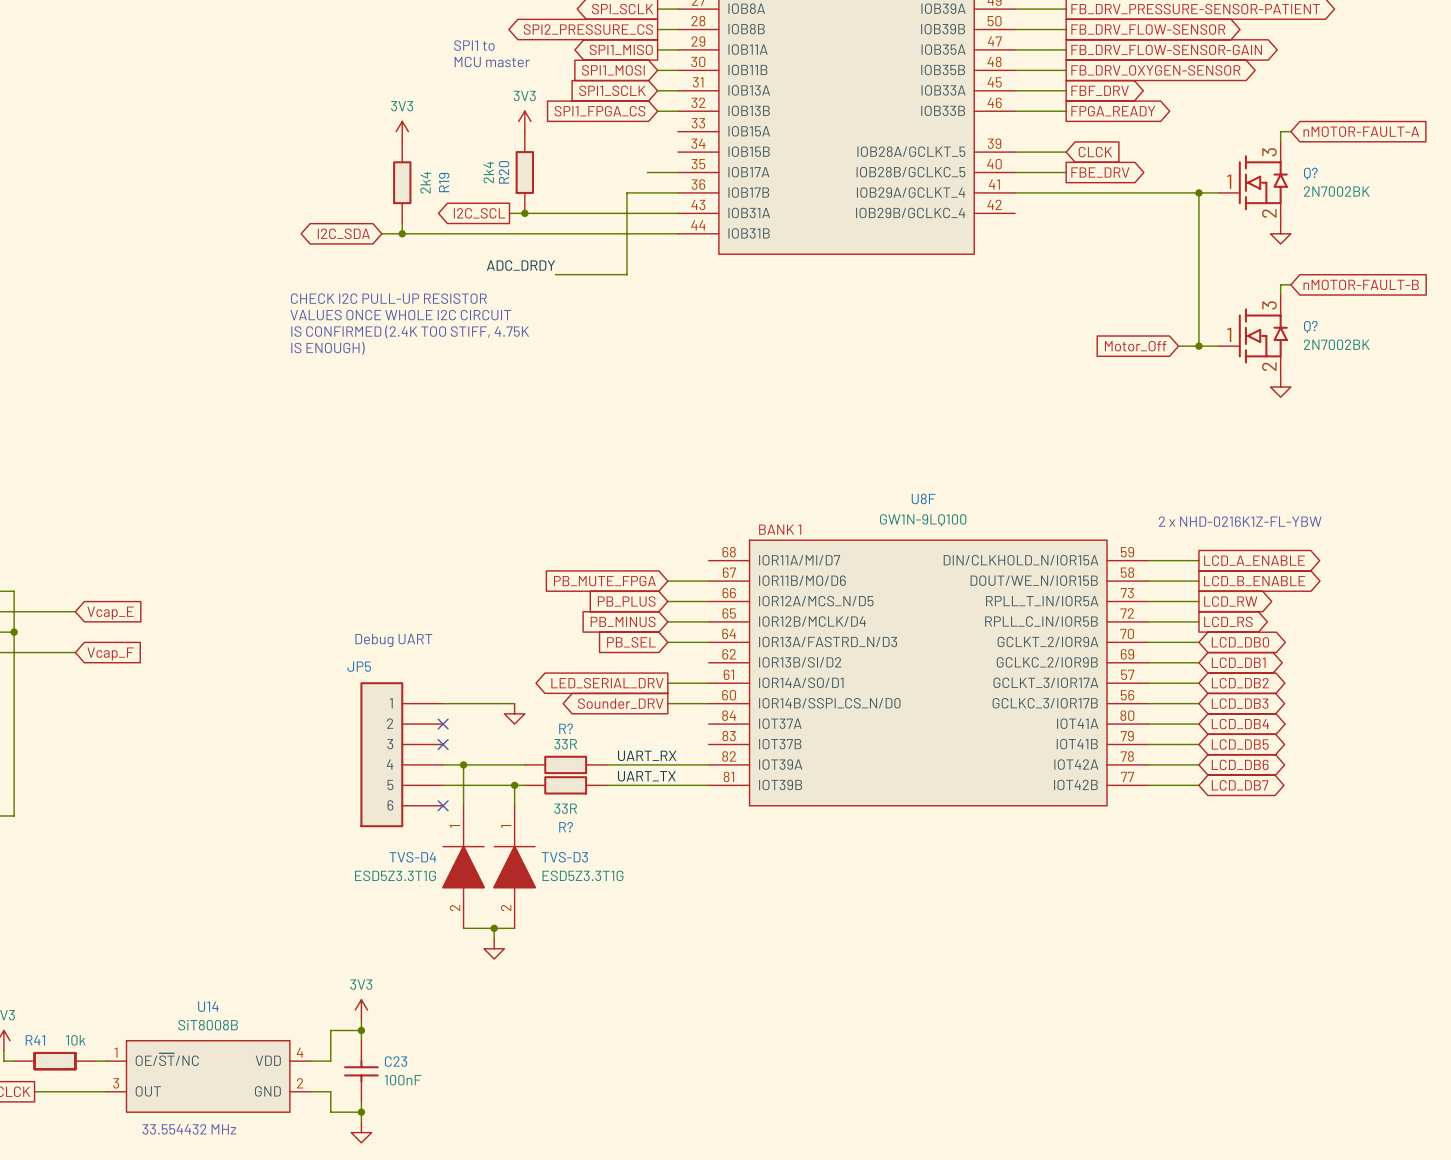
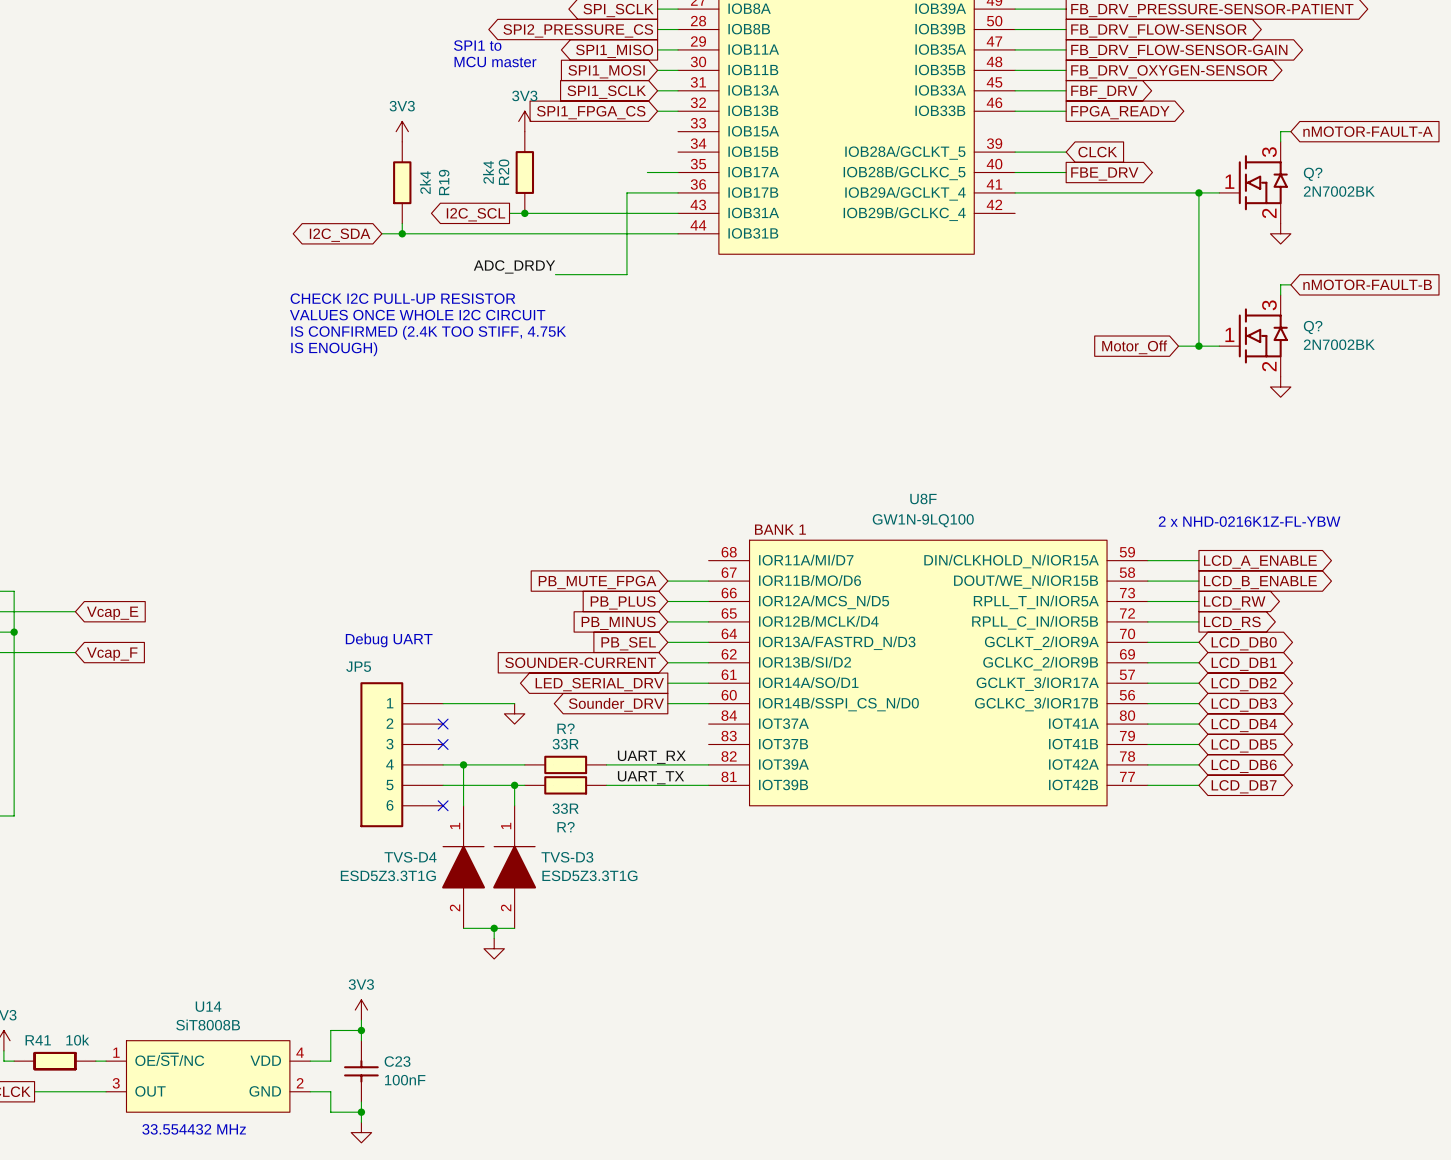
global label: none -> SOUNDER-CURRENT (580, 662)
wire: none -> (667, 662) (708, 662)

